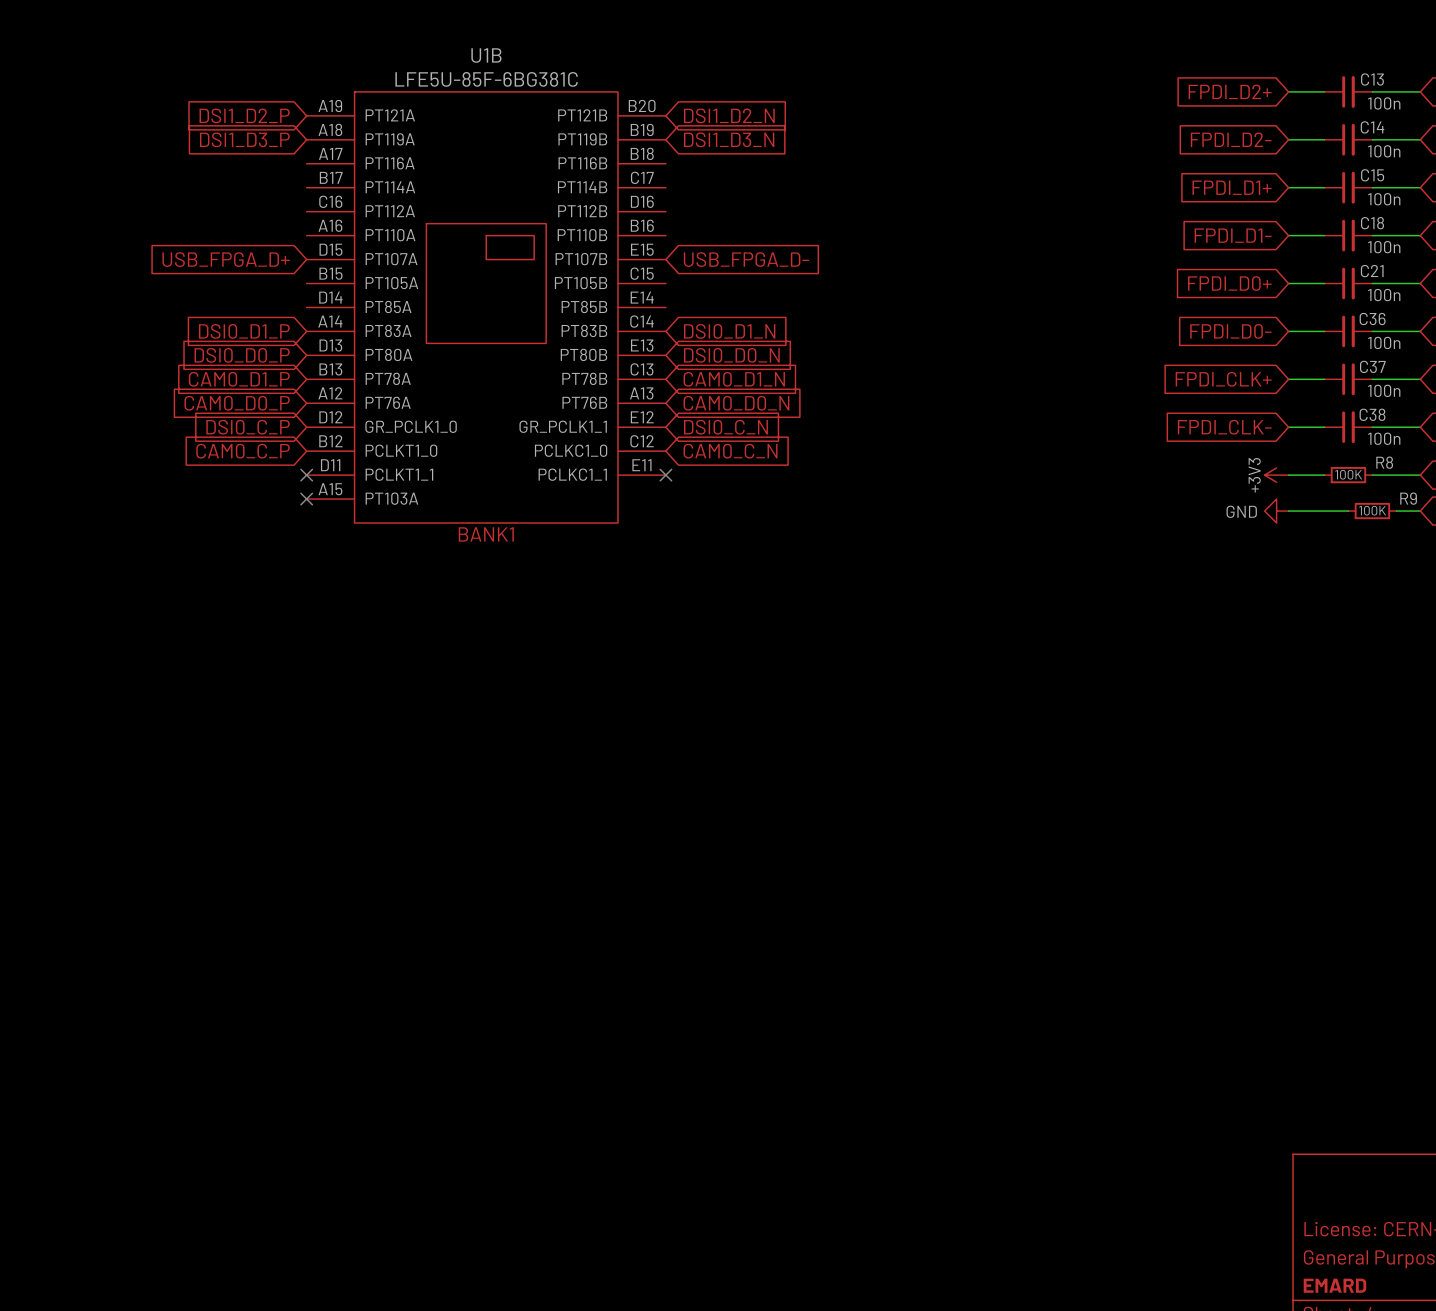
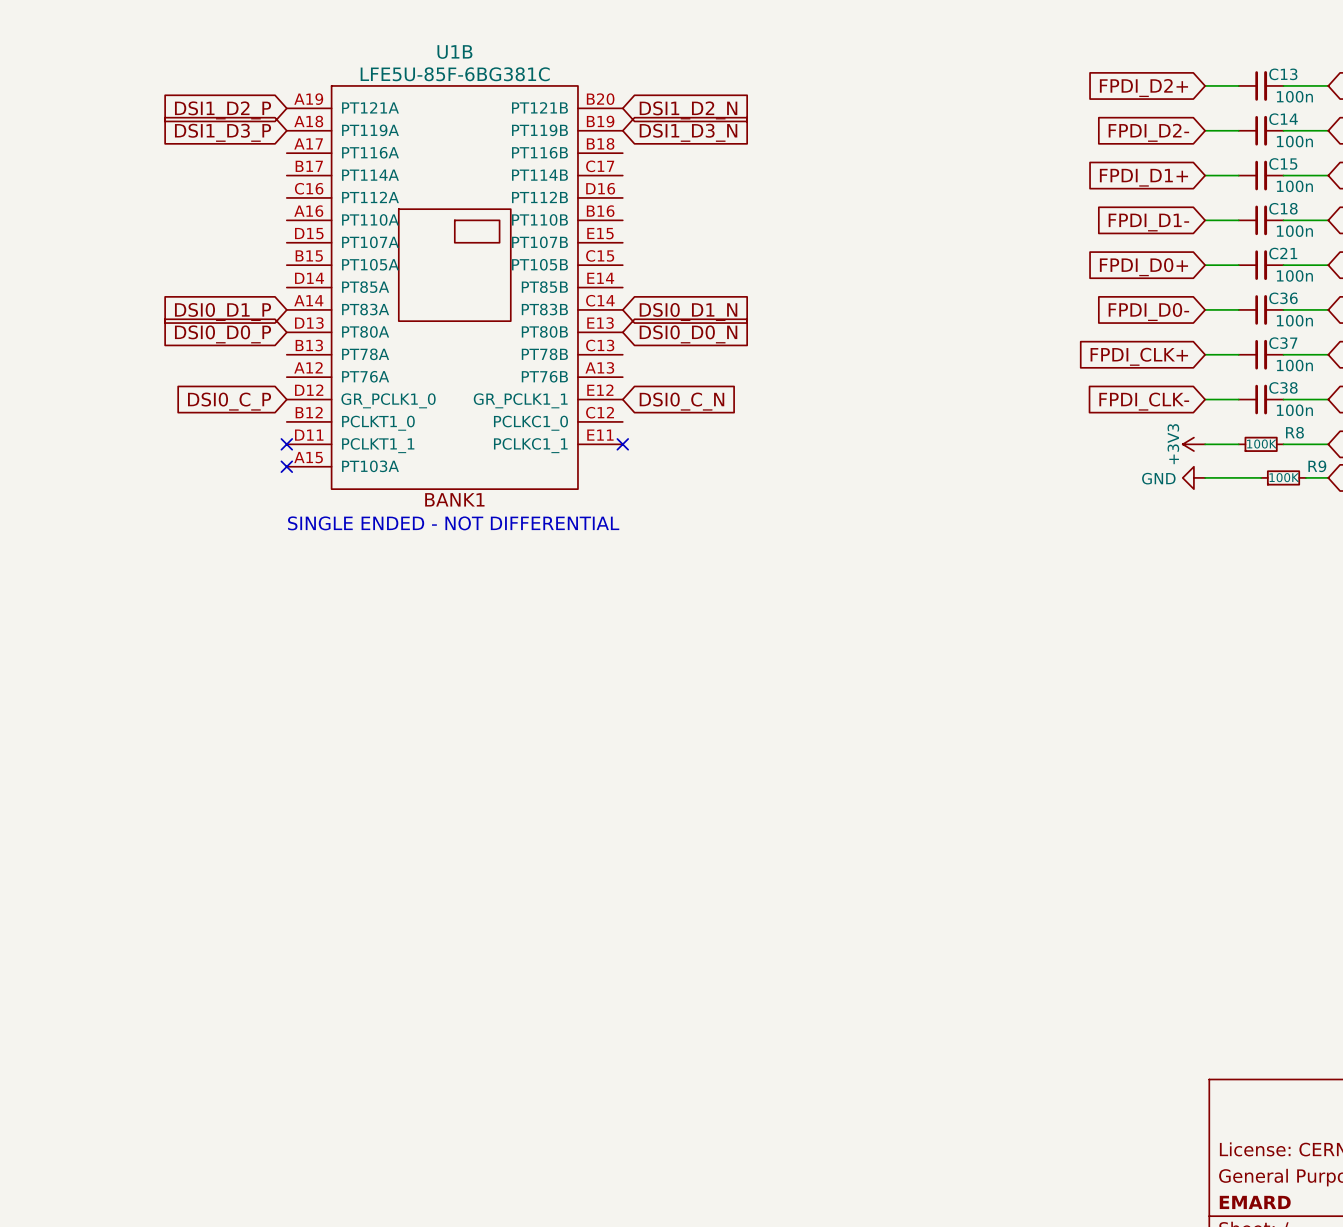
global label: USB_FPGA_D+ (226, 259) -> none
global label: USB_FPGA_D- (746, 259) -> none
global label: CAM0_D1_P (239, 379) -> none
global label: CAM0_D1_N (734, 379) -> none
global label: CAM0_D0_P (237, 403) -> none
global label: CAM0_D0_N (736, 403) -> none
global label: CAM0_C_P (243, 451) -> none
global label: CAM0_C_N (730, 451) -> none
text: none -> SINGLE ENDED - NOT DIFFERENTIAL (453, 523)

